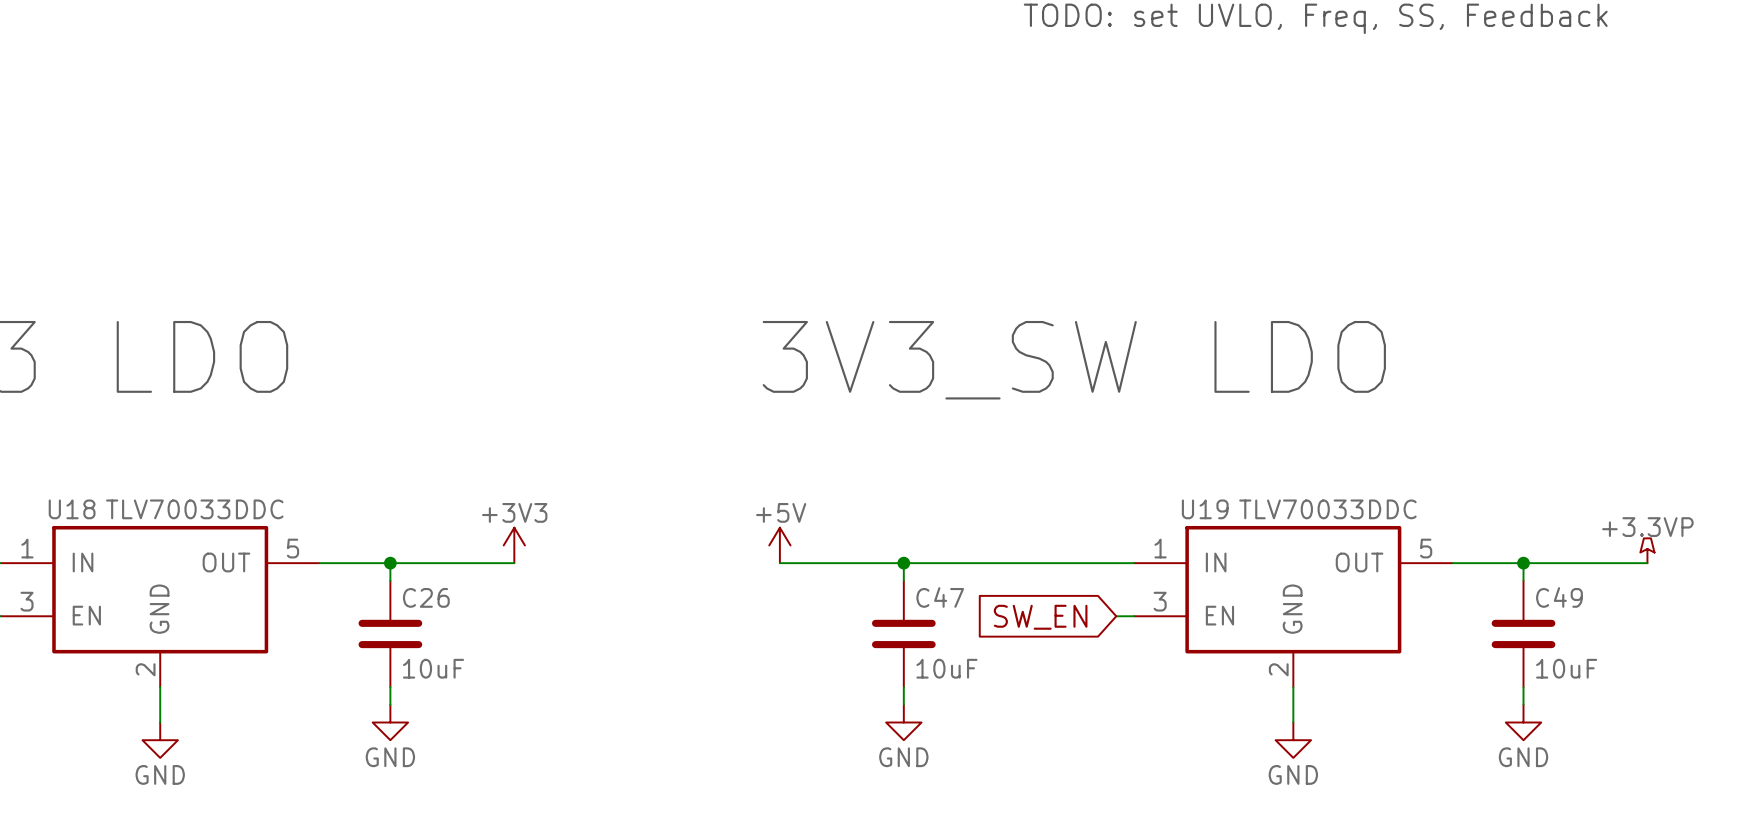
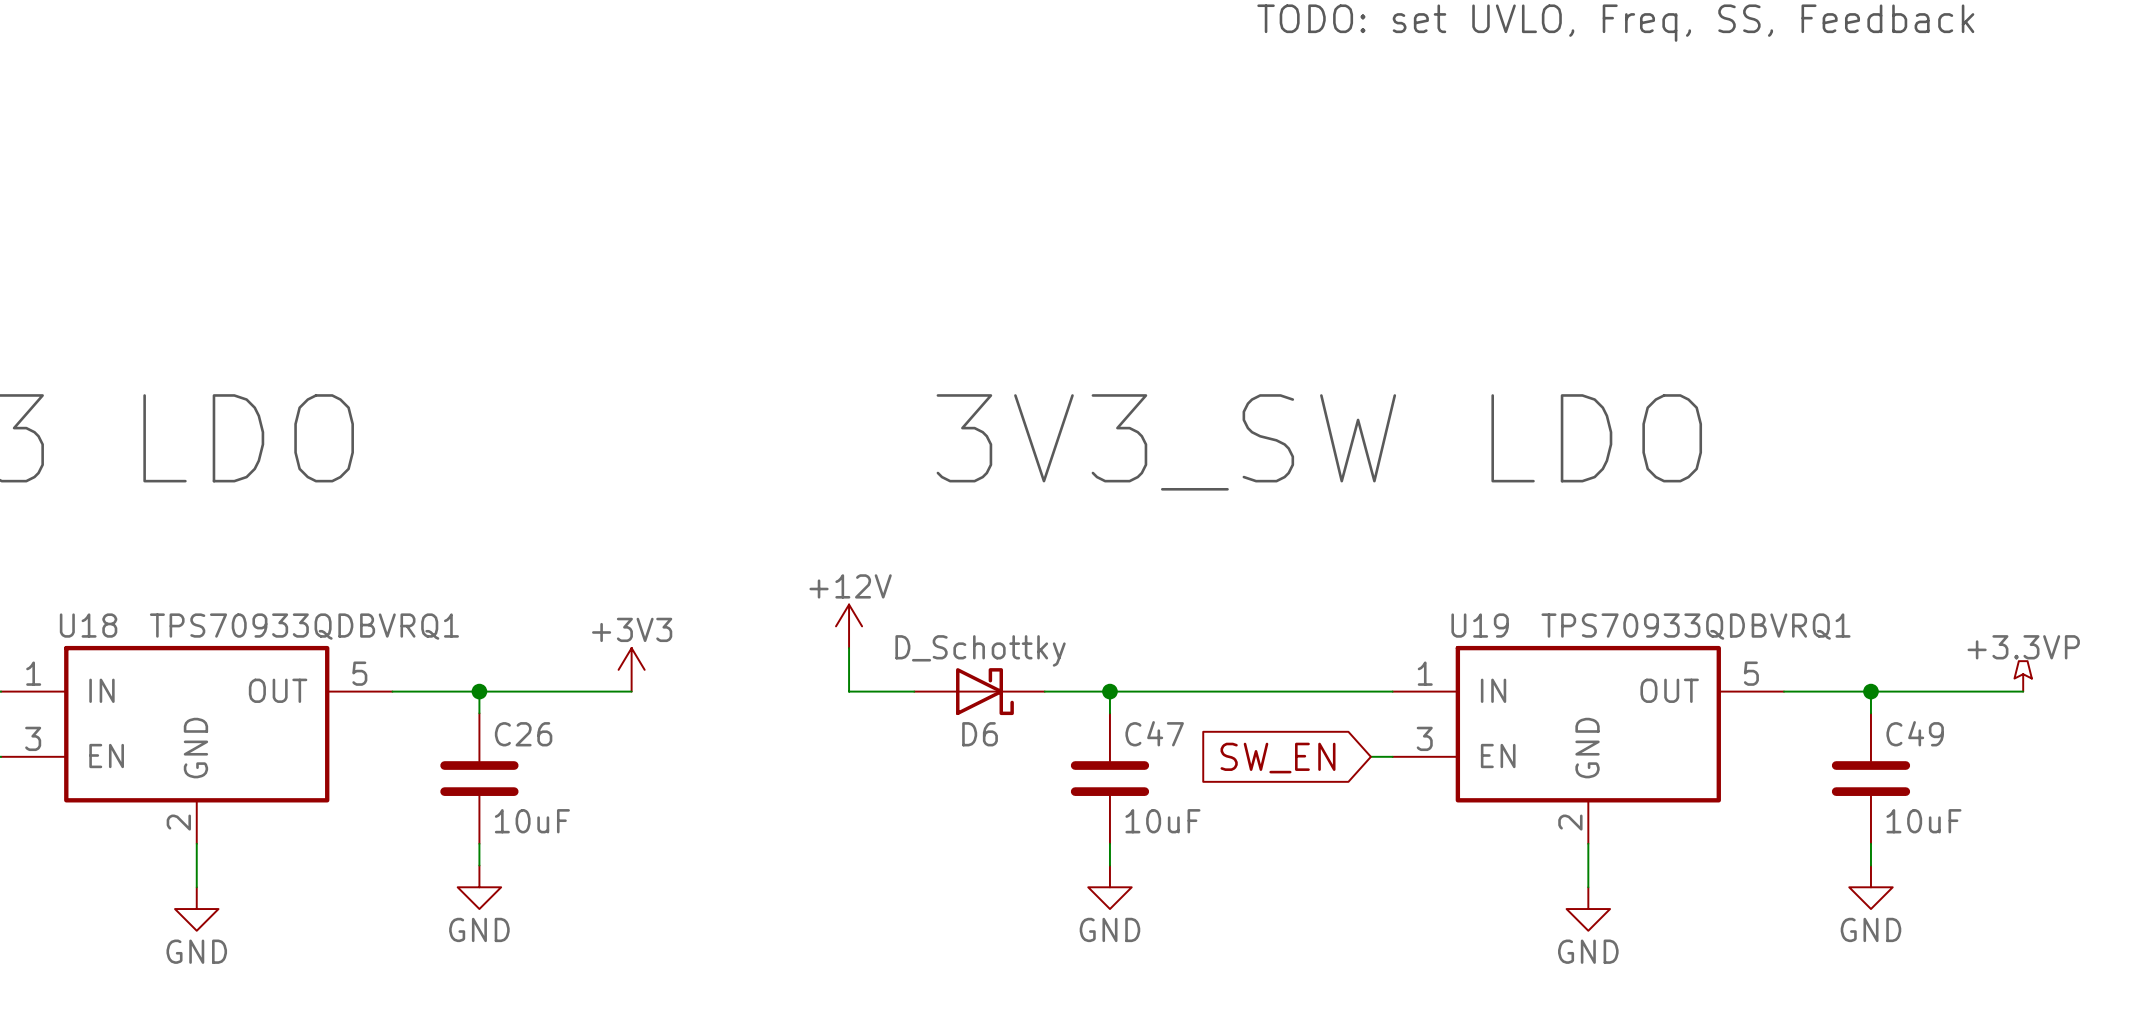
U18 value: TLV70033DDC (194, 509) -> TPS70933QDBVRQ1 (304, 626)
U19 value: TLV70033DDC (1327, 509) -> TPS70933QDBVRQ1 (1696, 626)
power symbol: none -> +12V (849, 626)
wire: none -> (849, 648) (849, 691) (914, 691)
power symbol: +5V (779, 545) -> none
D6: none -> D_Schottky (979, 691)

